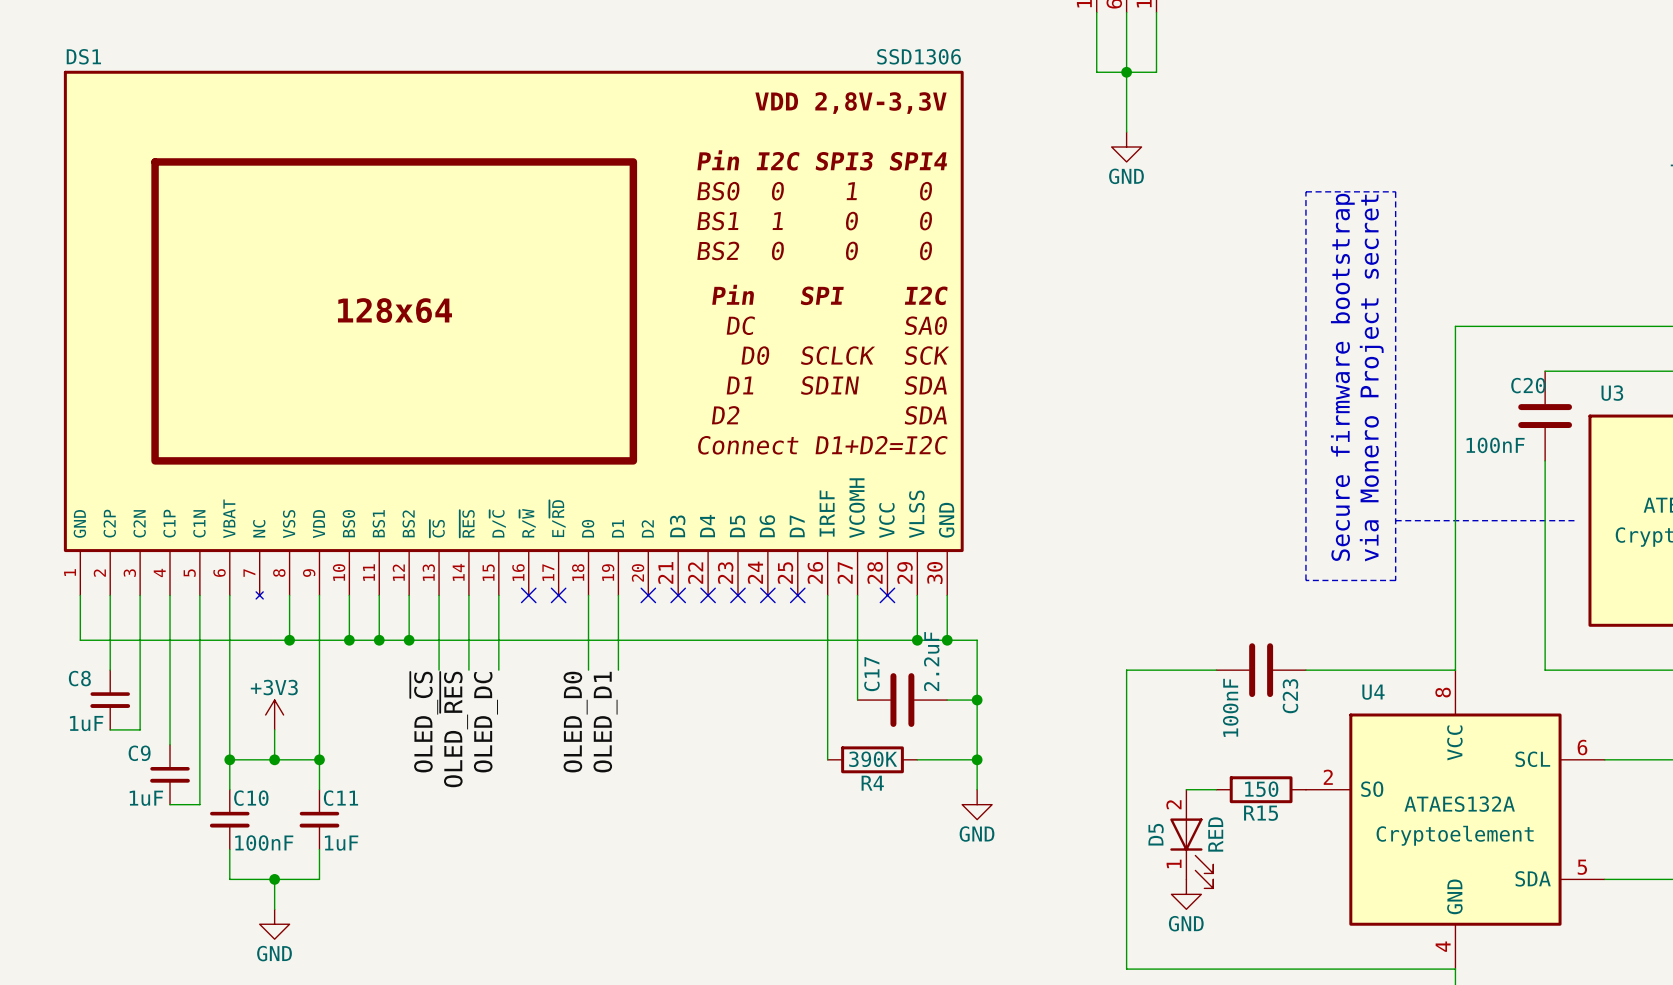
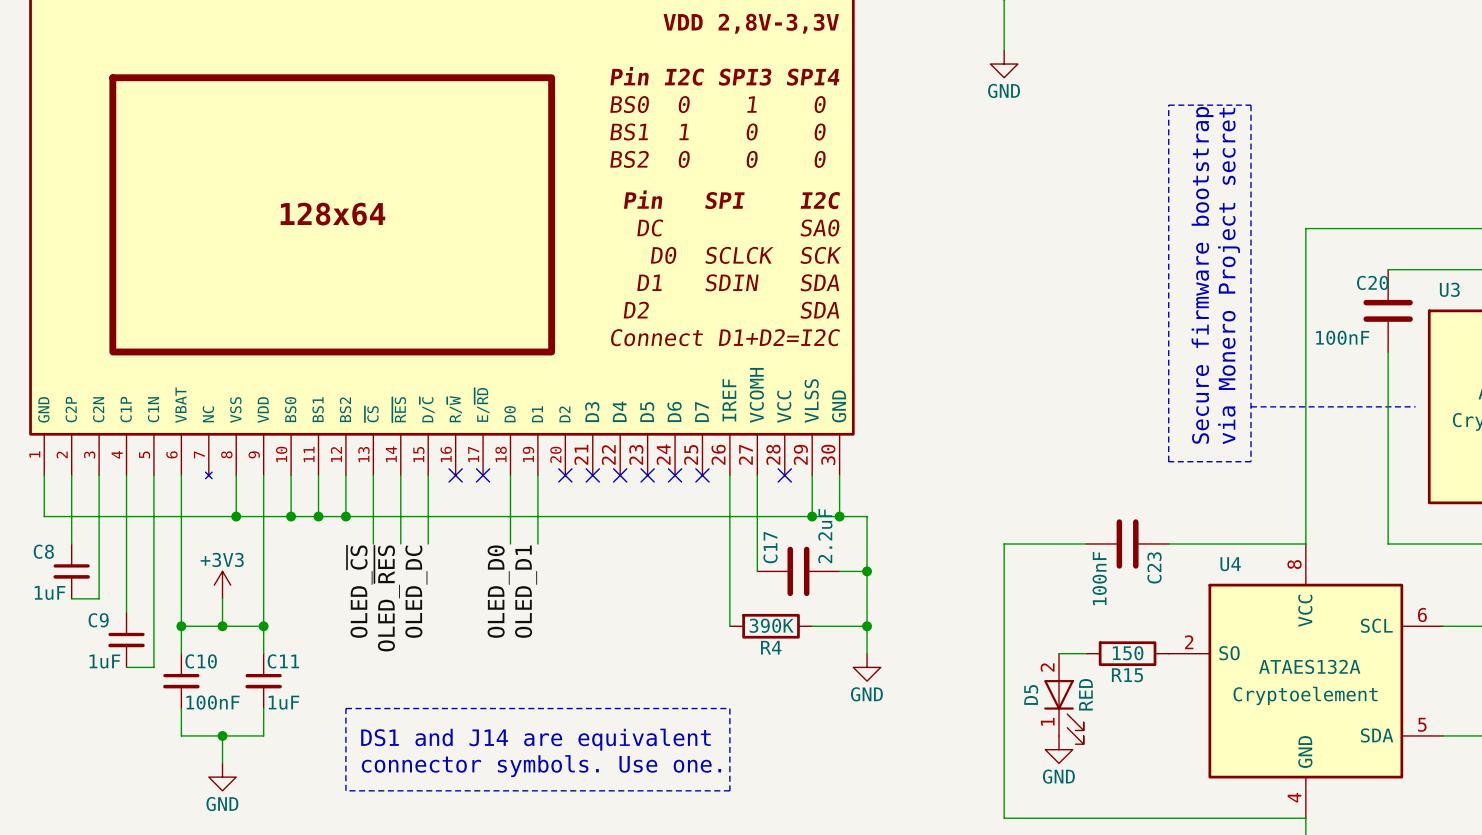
line: none -> (345, 708) (345, 790) (729, 790) (729, 708) (345, 708)
text: none -> DS1 and J14 are equivalent (535, 739)
text: none -> connector symbols. Use one. (541, 766)

